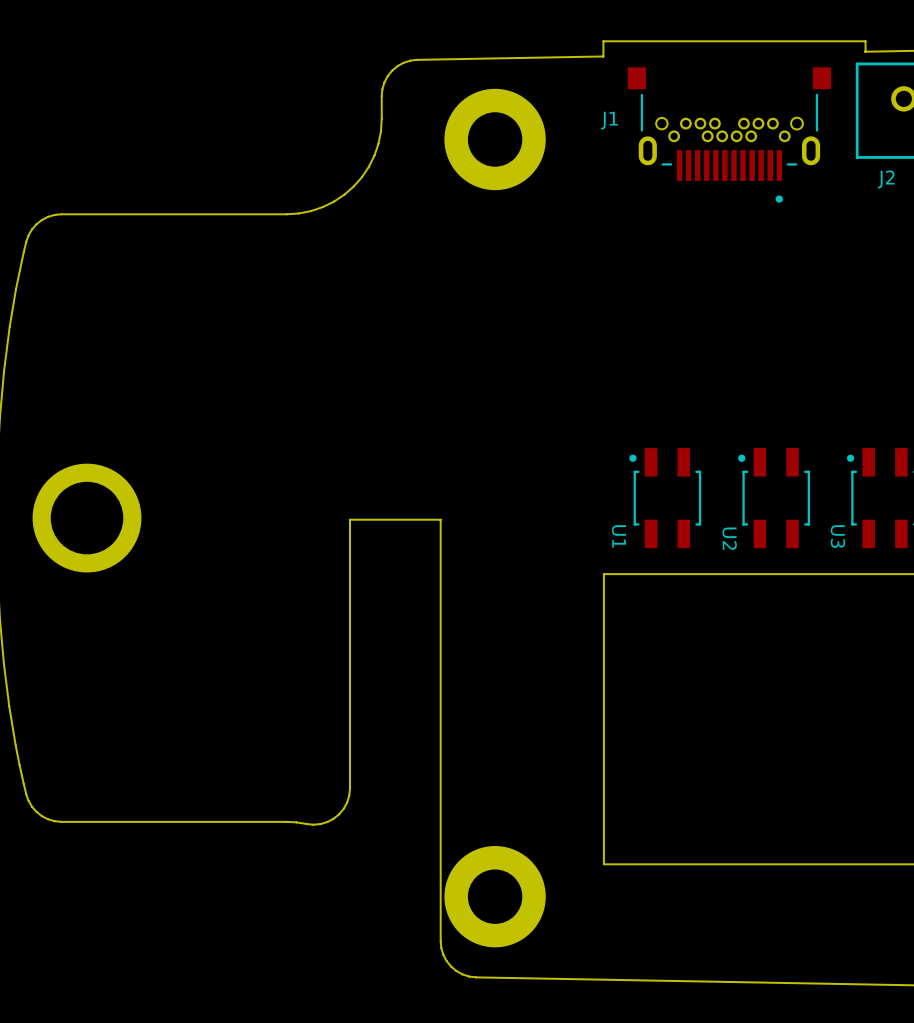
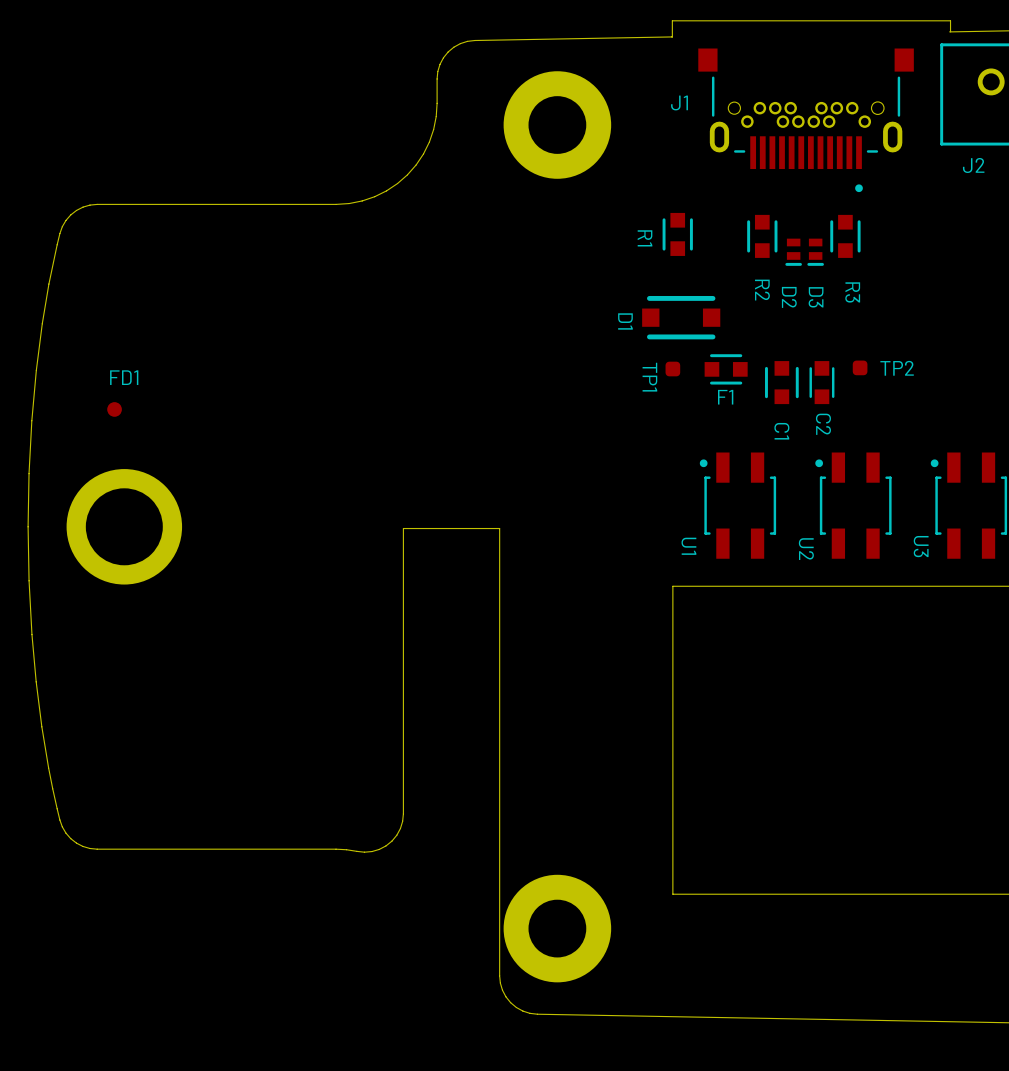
R1: none -> (677, 234)
R2: none -> (762, 236)
R3: none -> (845, 236)
D2: none -> (793, 252)
D3: none -> (815, 252)
D1: none -> (681, 317)
TP2: none -> (860, 367)
TP1: none -> (672, 369)
F1: none -> (726, 369)
C1: none -> (781, 382)
C2: none -> (821, 382)
FD1: none -> (114, 409)

